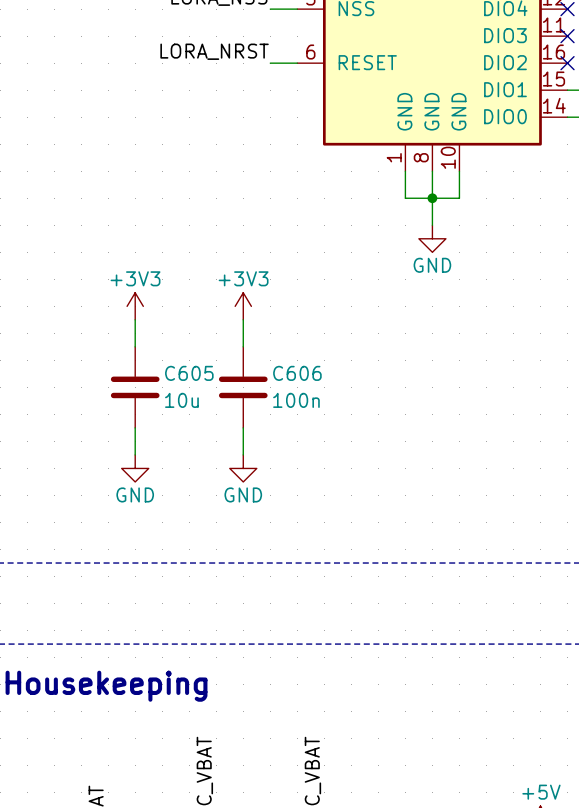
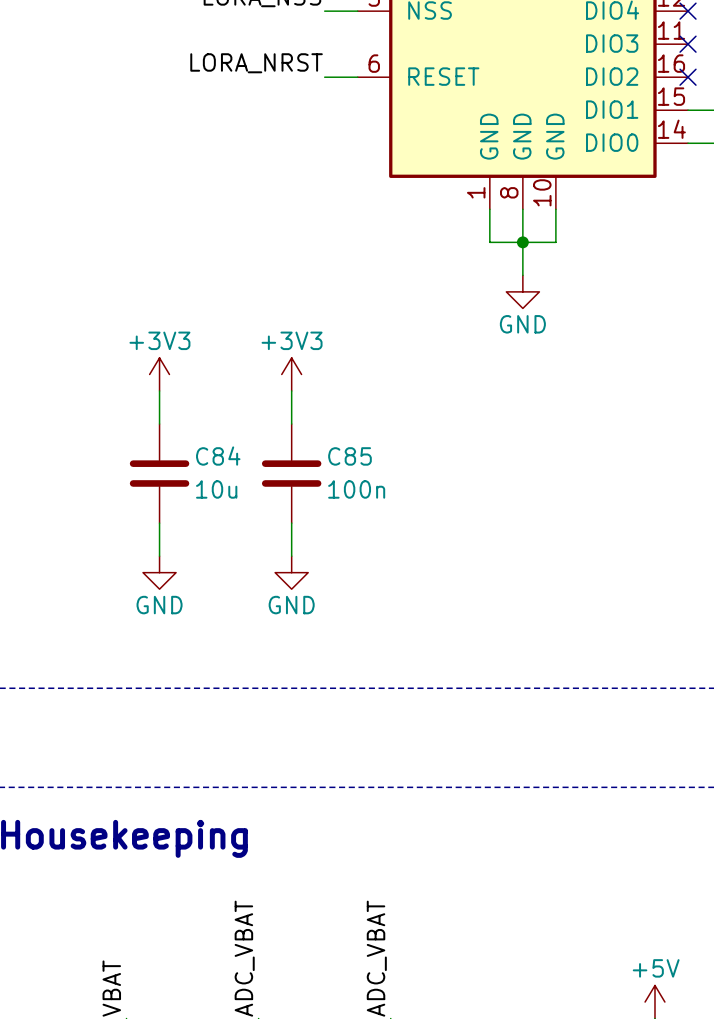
C605 name: C605 (189, 373) -> C84 (218, 456)
C606 name: C606 (297, 373) -> C85 (349, 456)

